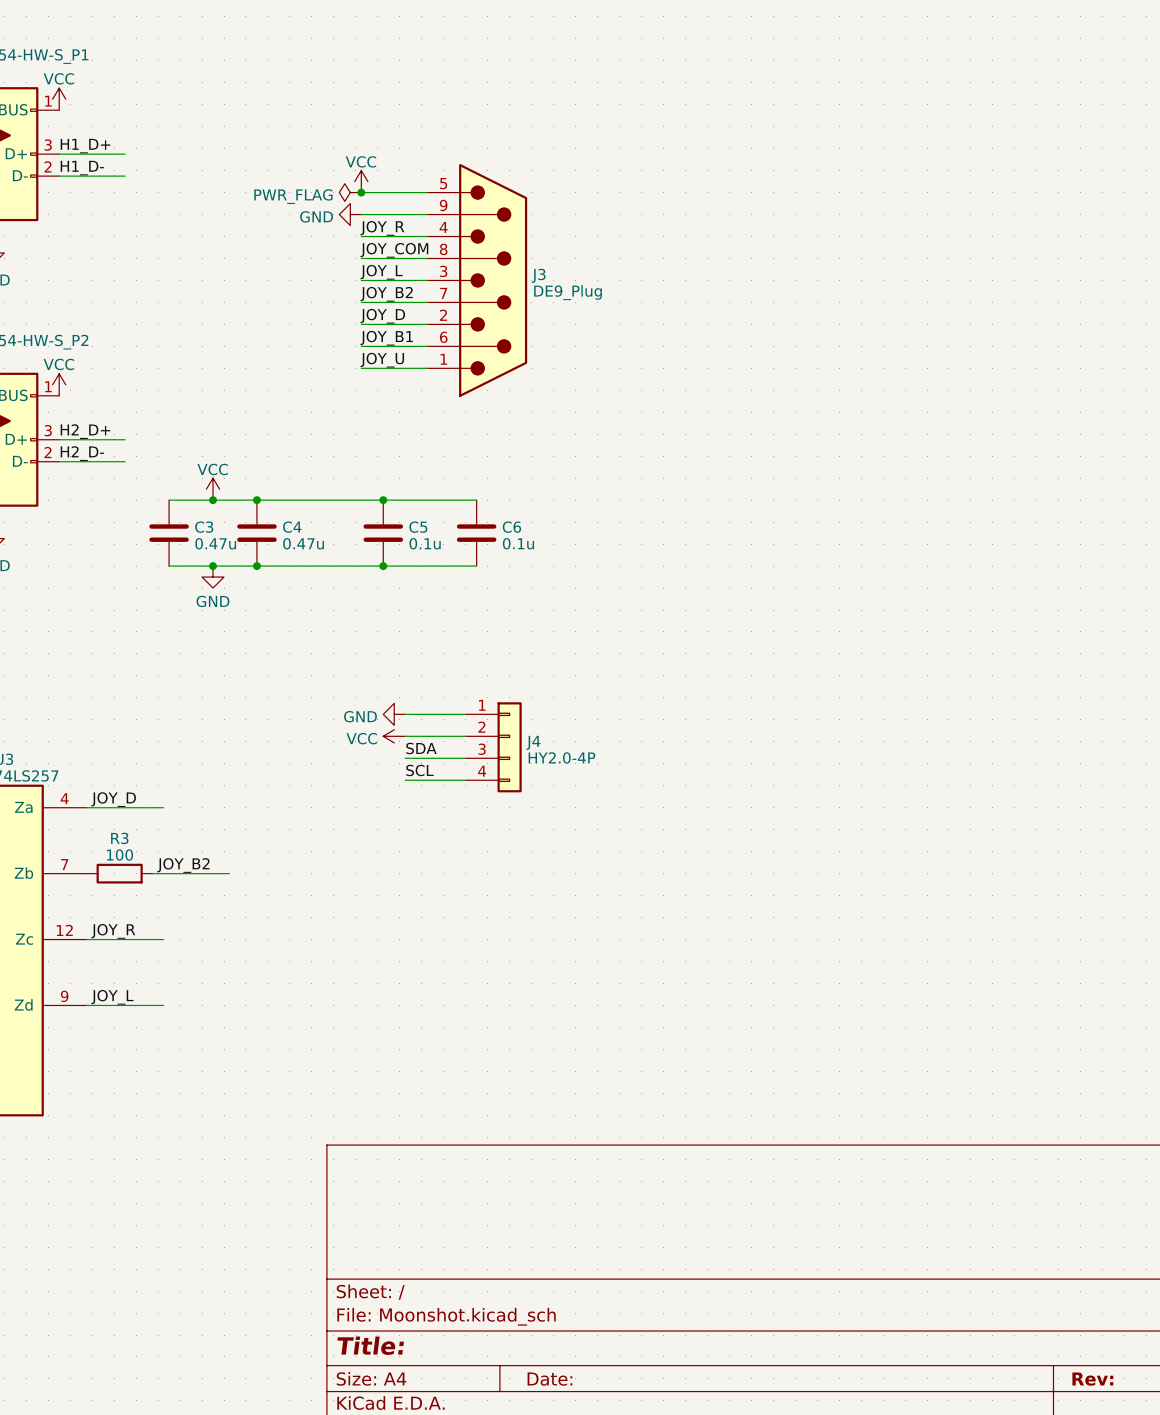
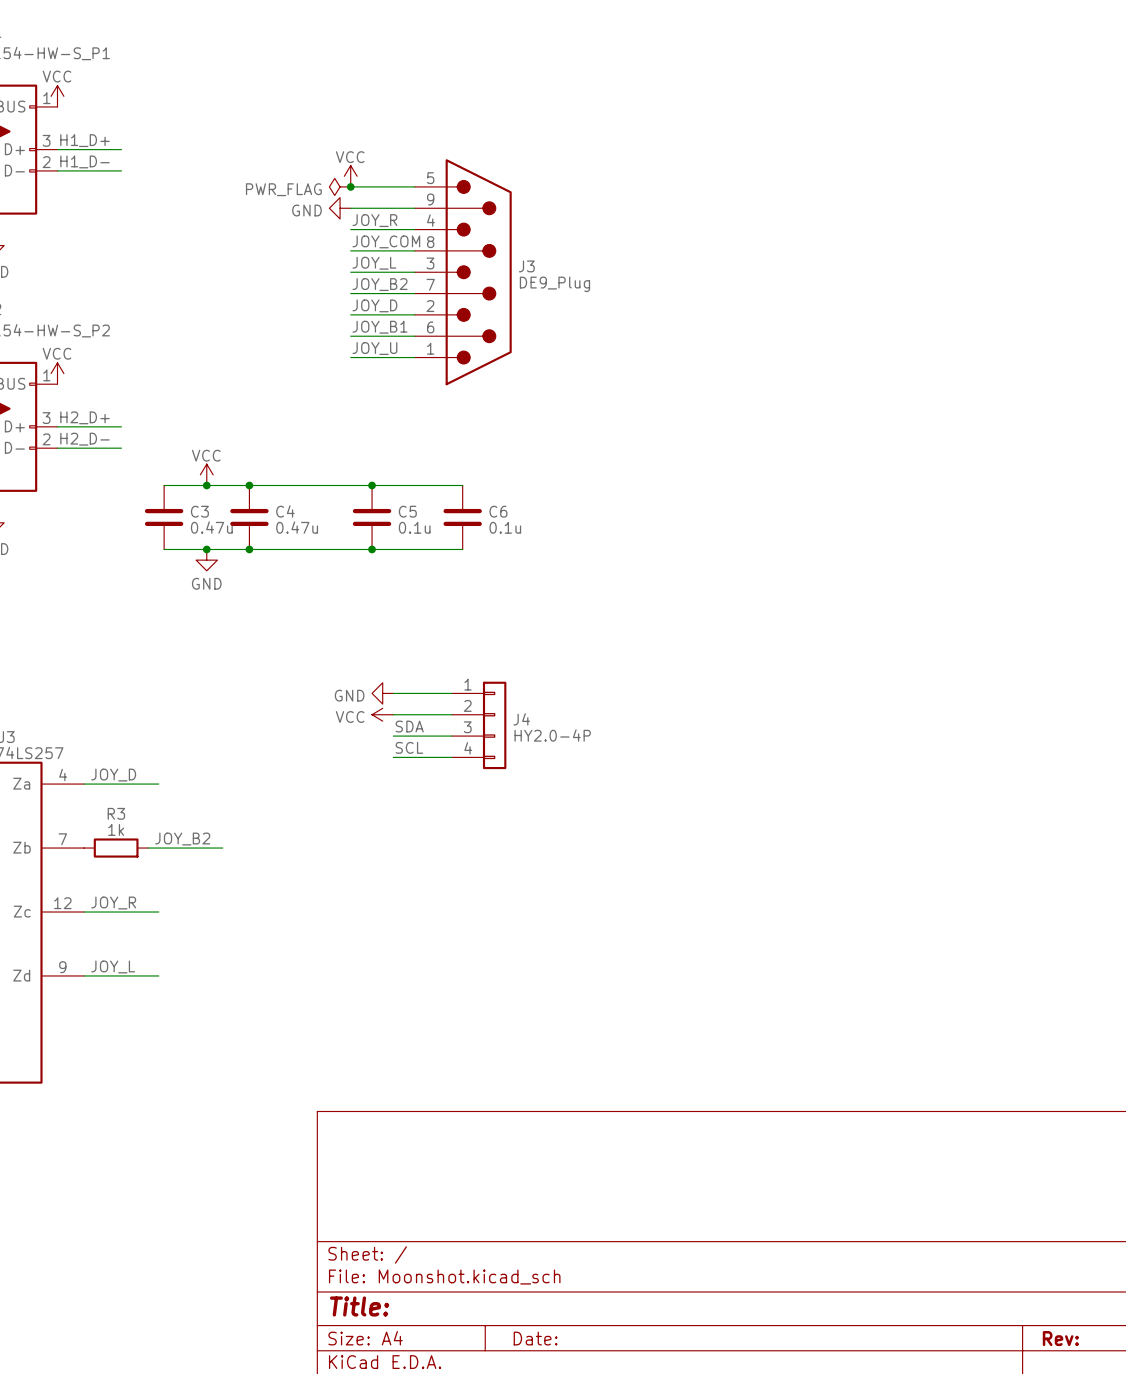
R3 value: 100 (119, 855) -> 1k (116, 829)

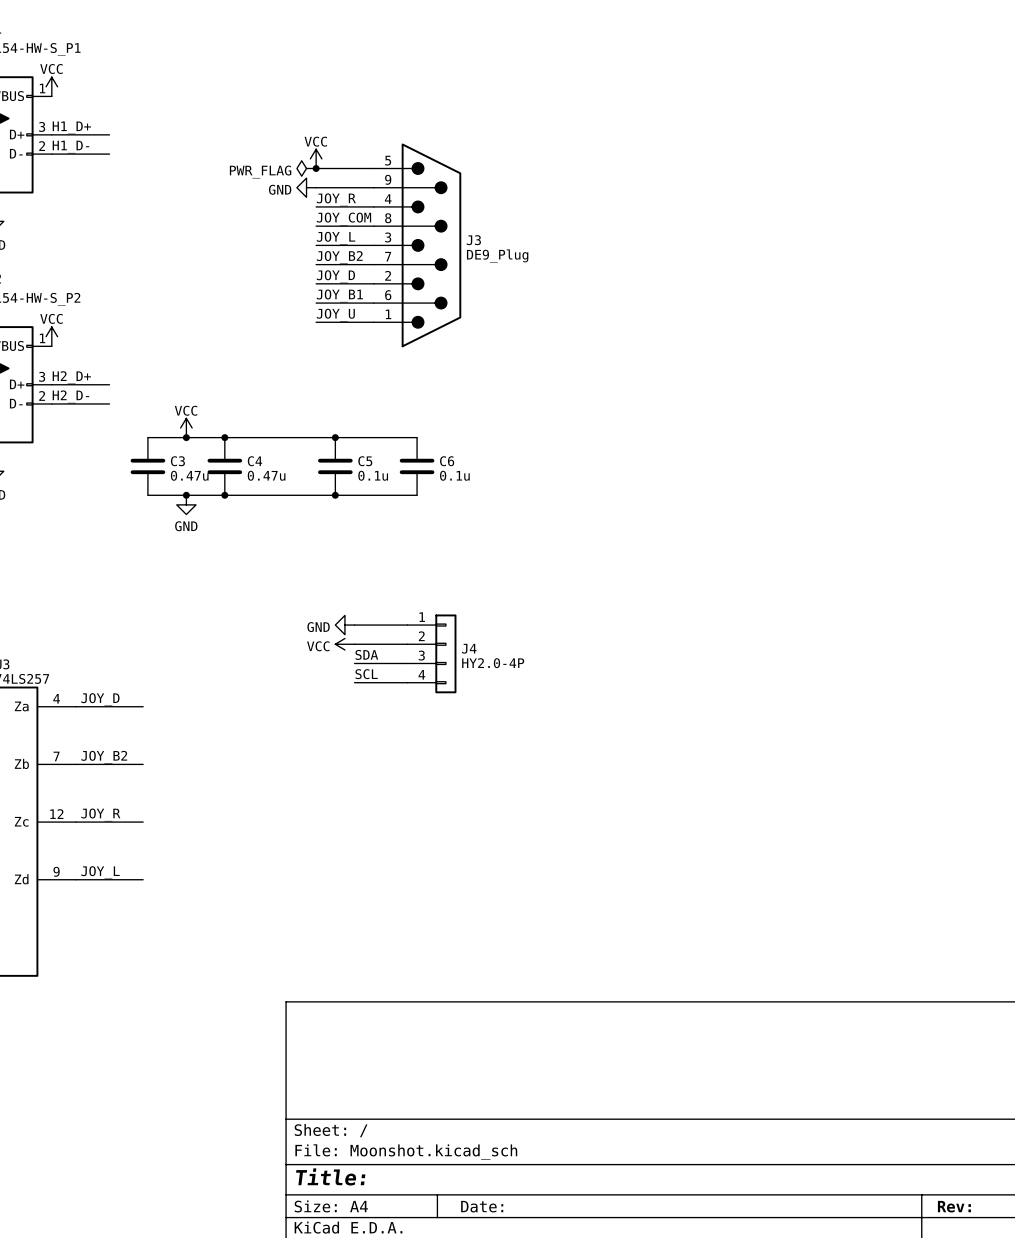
label position: JOY_B2 (182, 839) -> JOY_B2 (104, 757)
R3: 1k (116, 848) -> none
wire: (158, 848) (222, 848) -> (75, 764) (133, 764)

